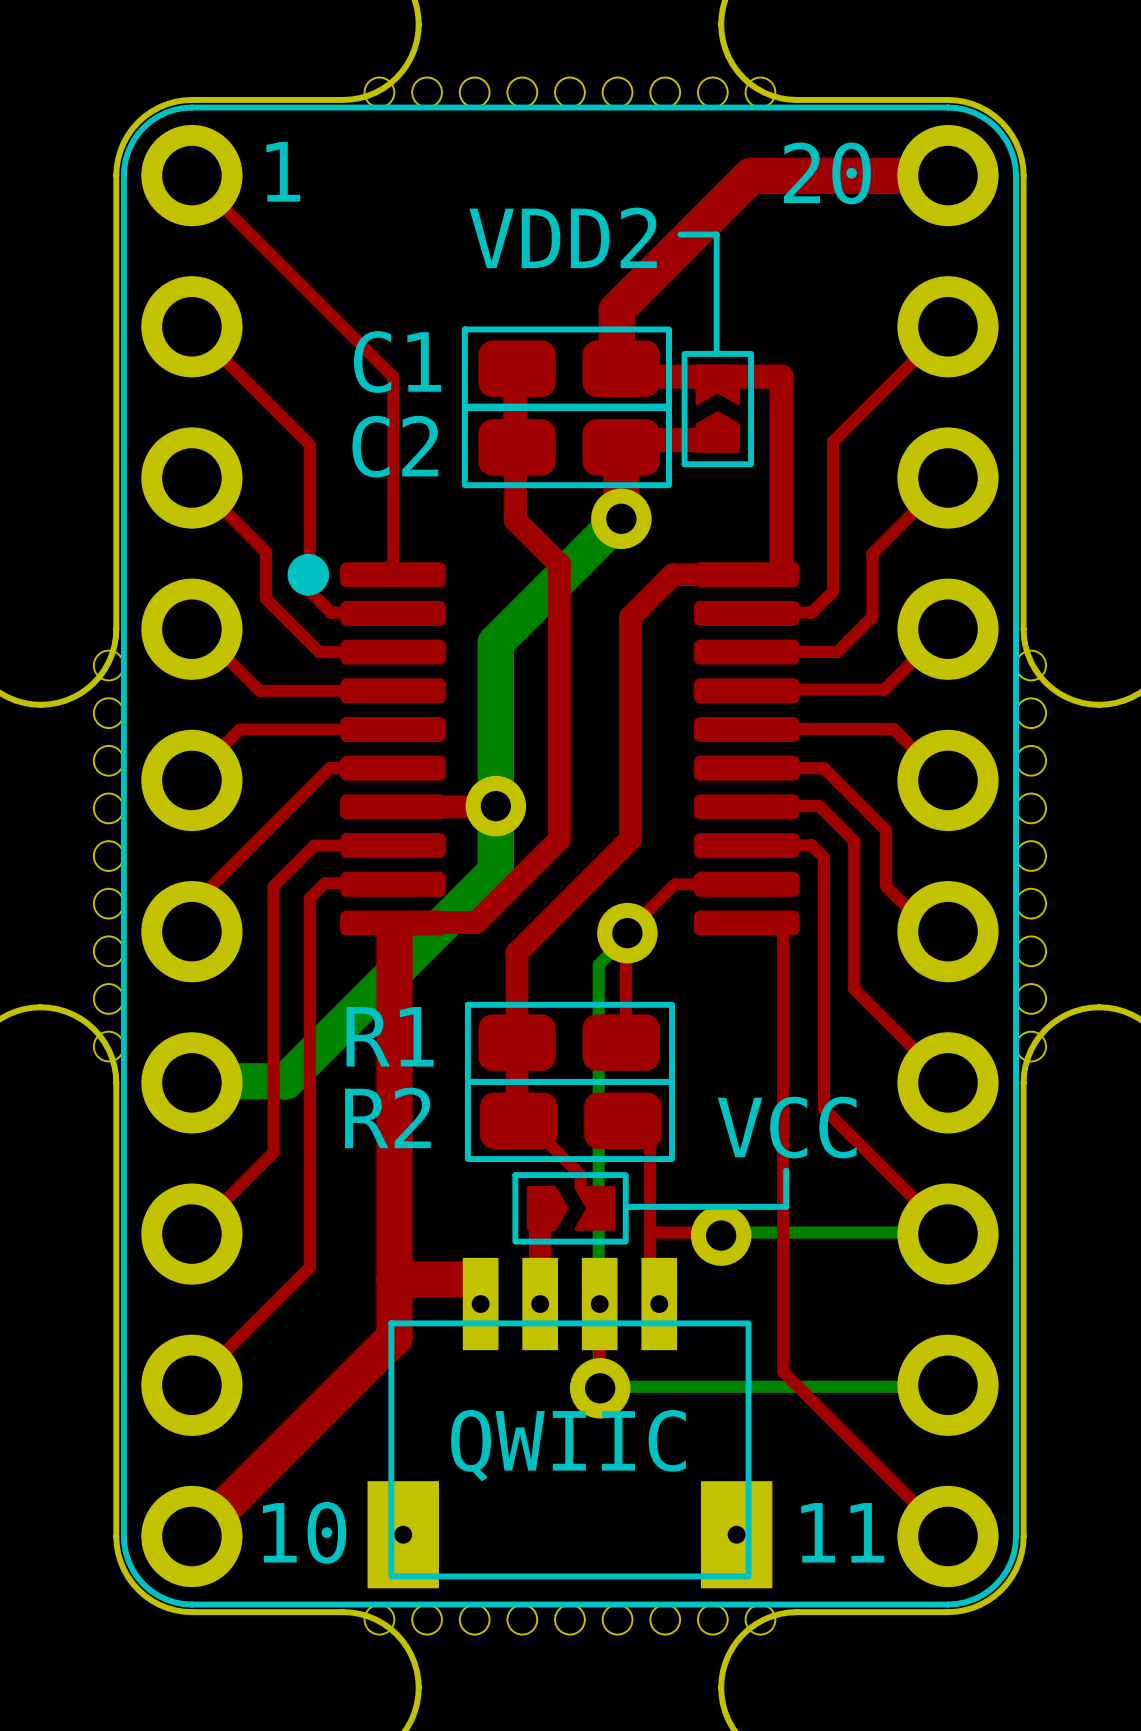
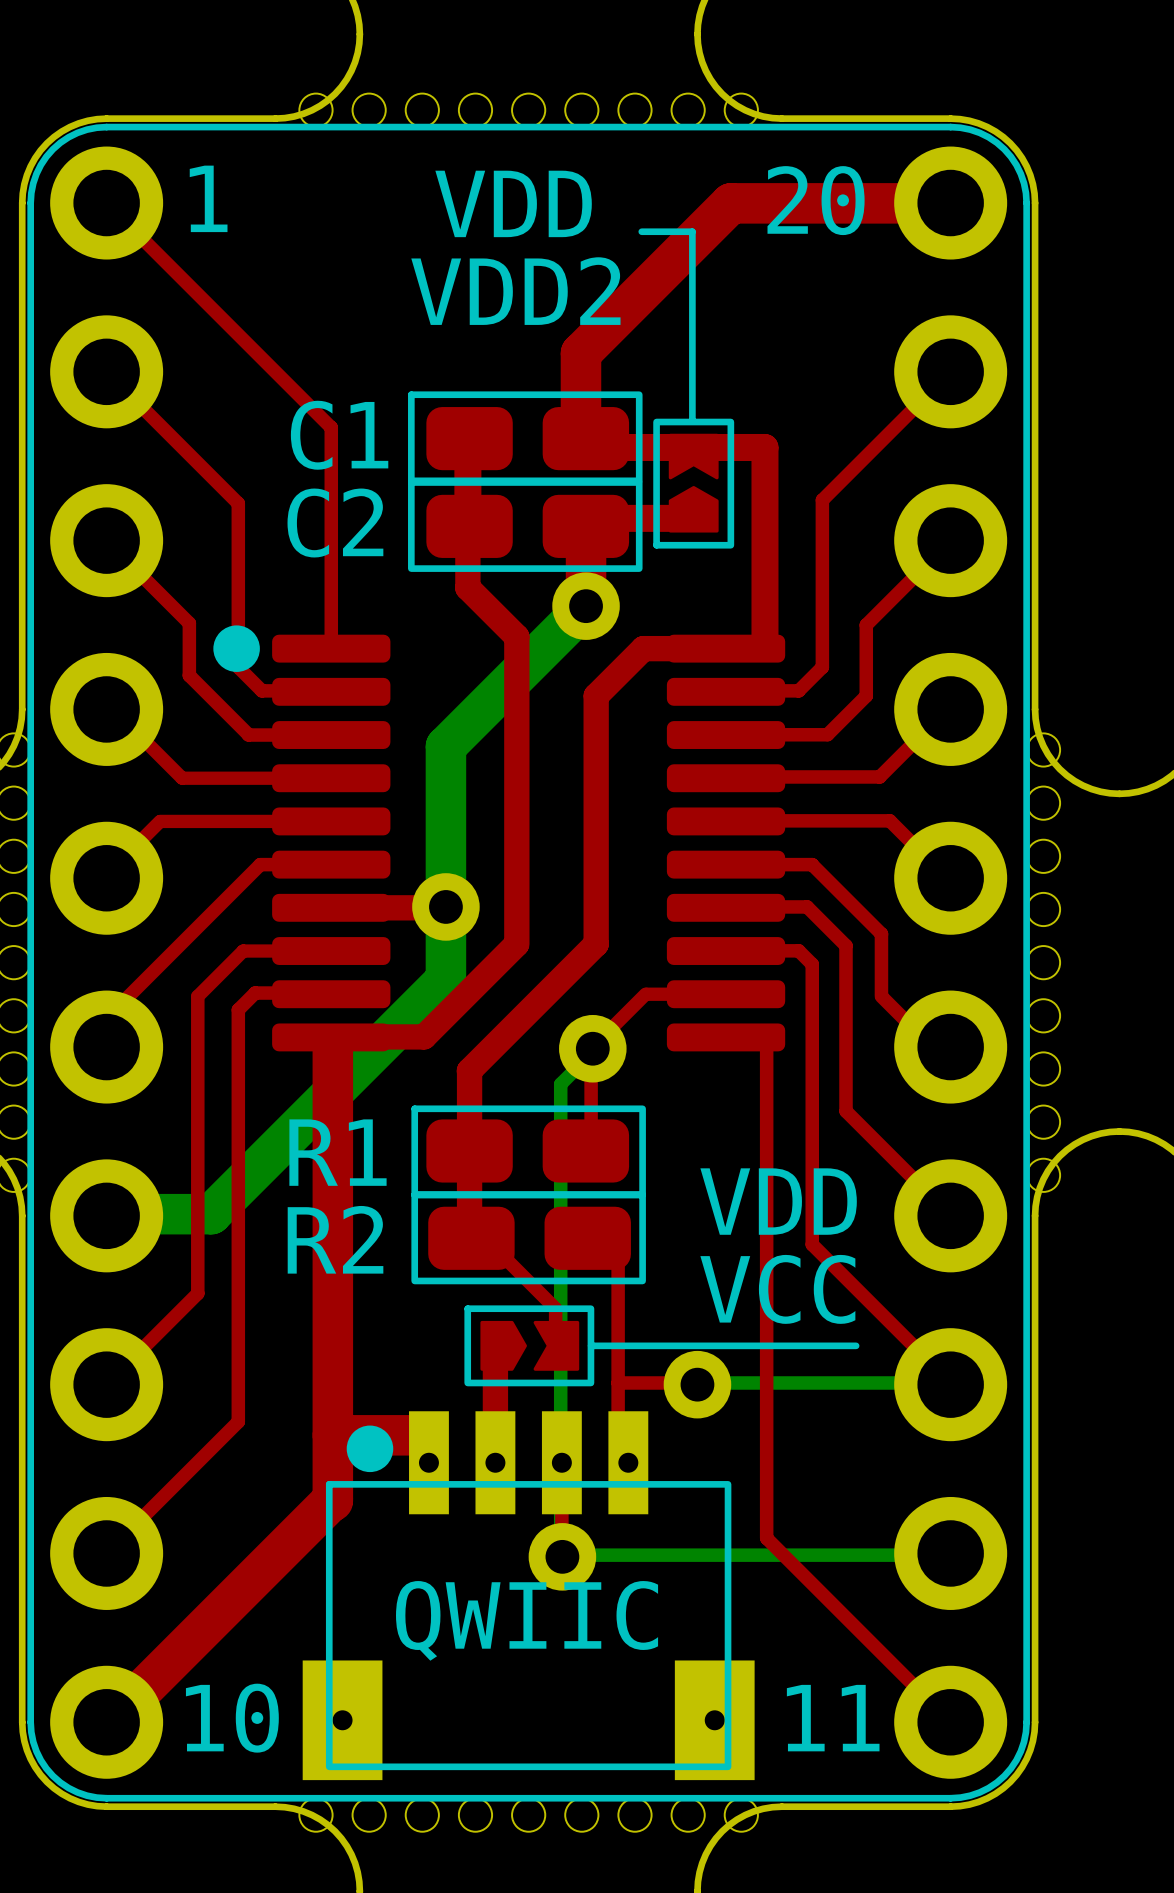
part footprint: [120, 104, 1020, 1608] -> [27, 123, 1030, 1802]

